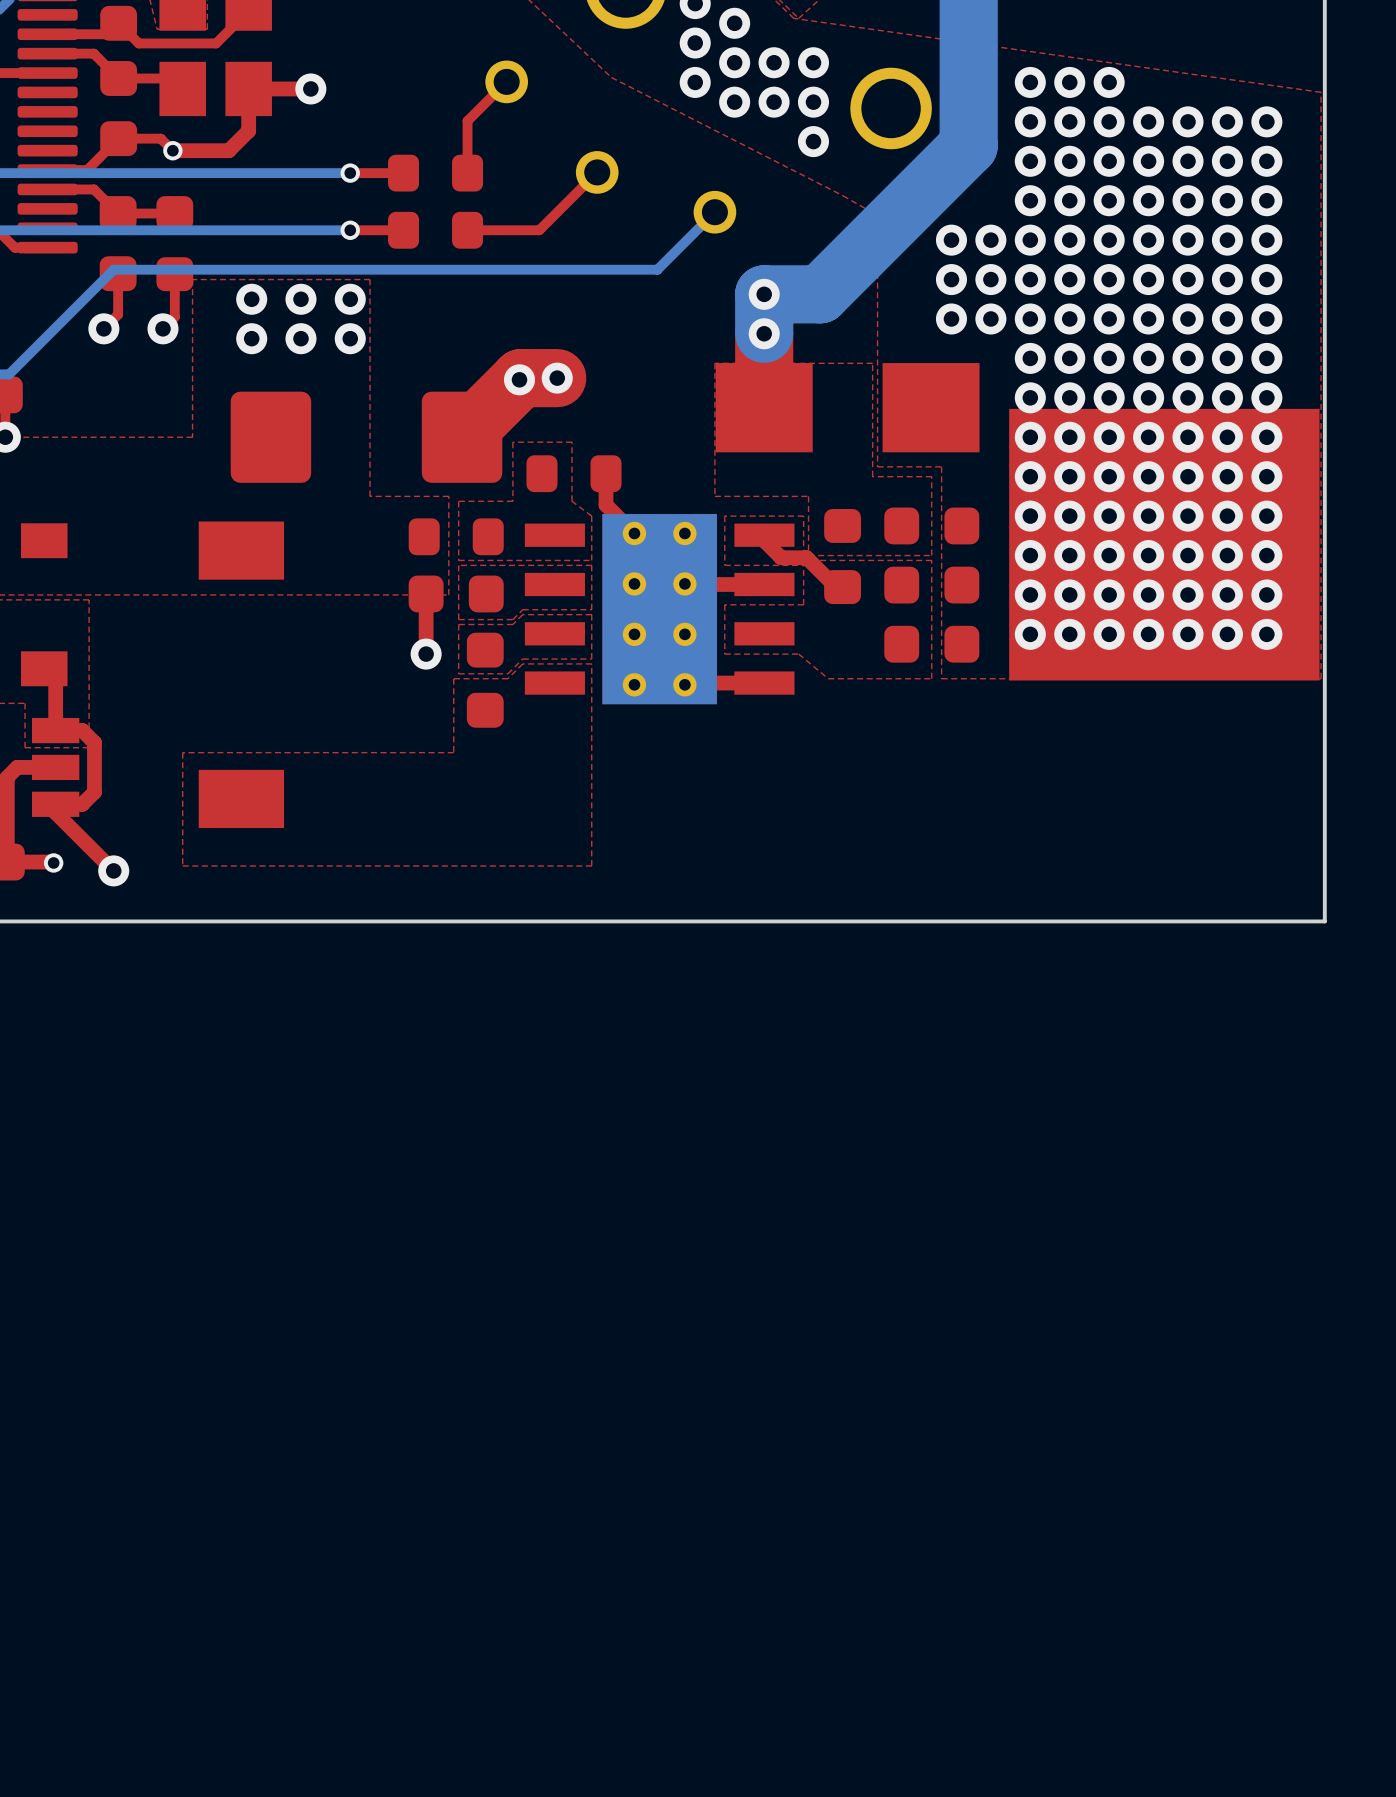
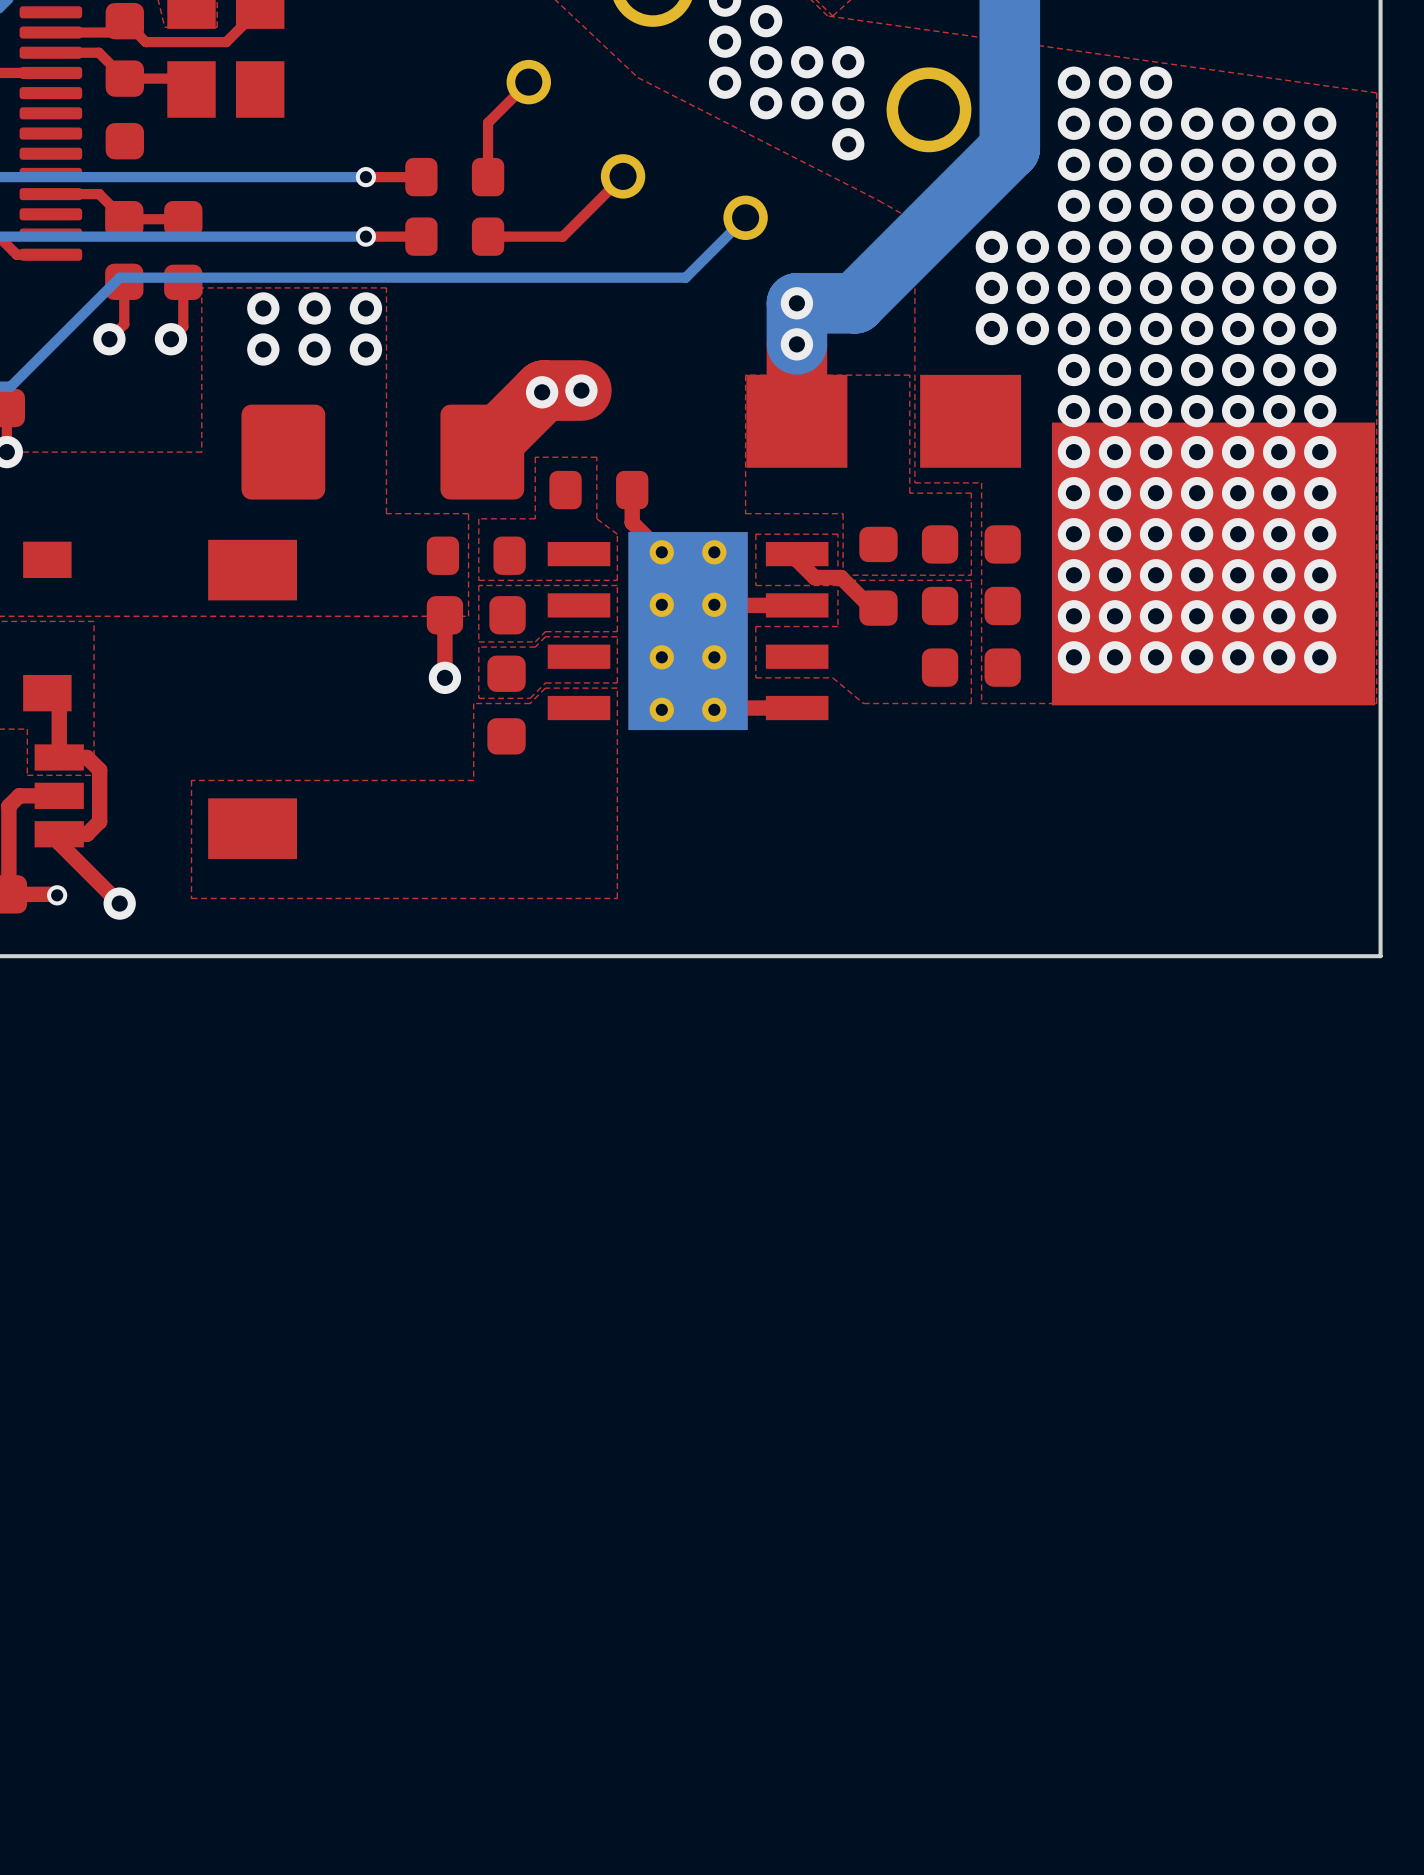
top track: (310, 88) (248, 88) (248, 130) (228, 150) (172, 150) (160, 138) (118, 138) (87, 170) (47, 170) -> none
via: (310, 88) -> none
via: (172, 150) -> none

